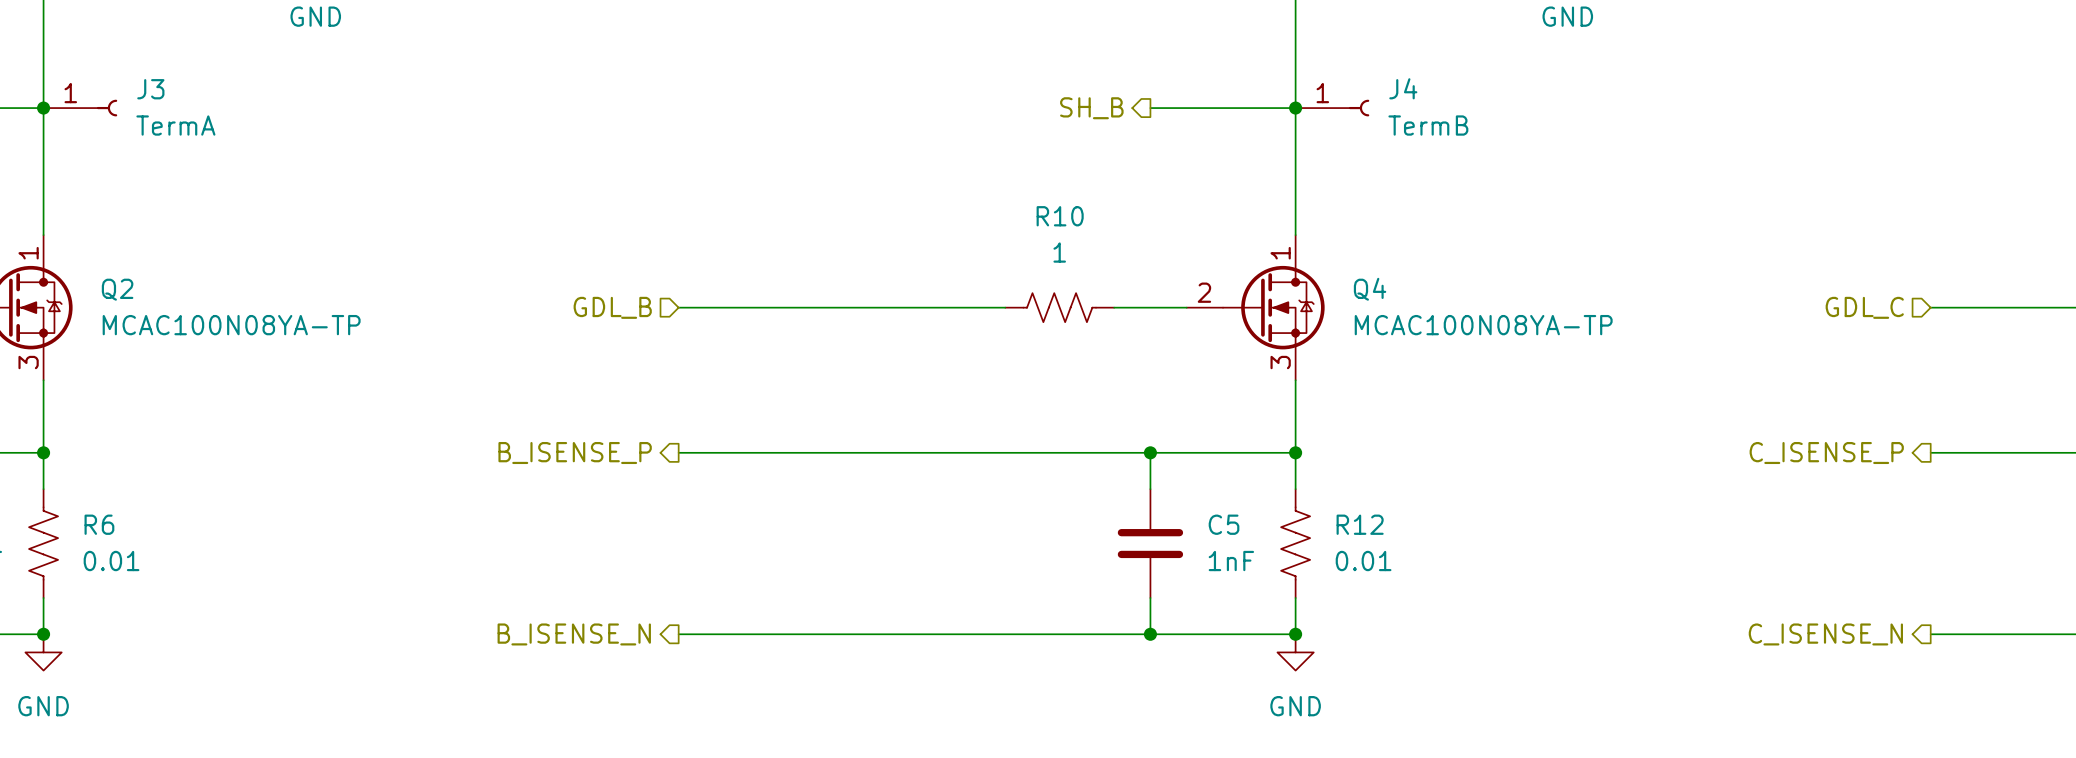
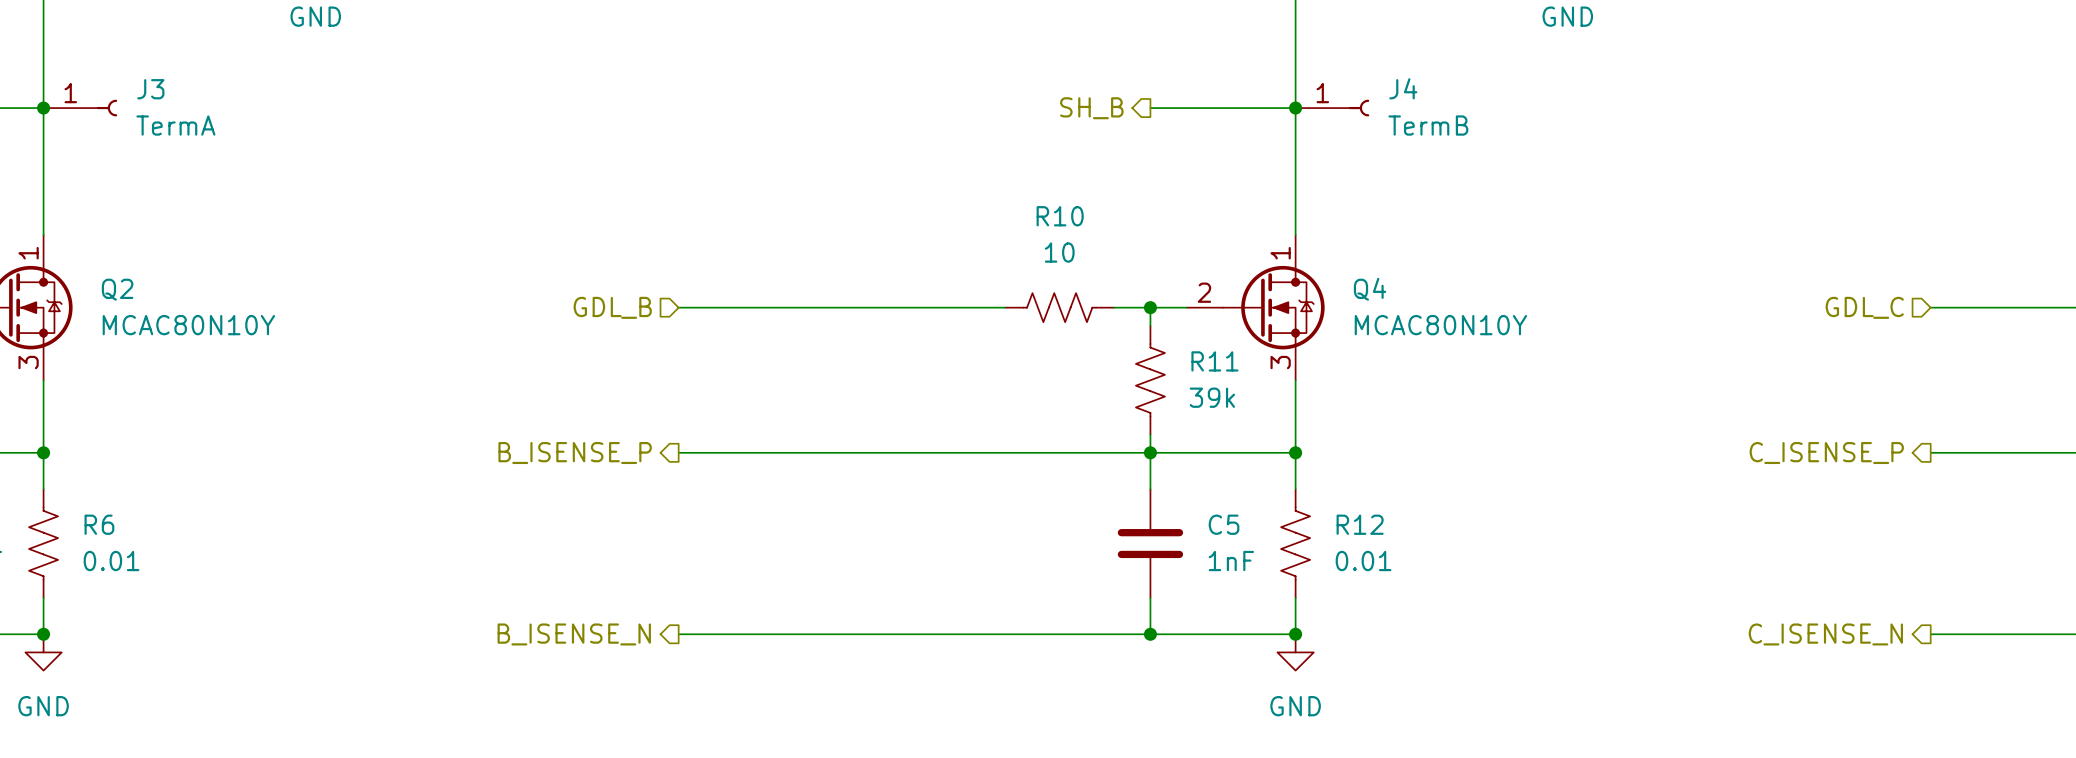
R10 value: 1 (1059, 252) -> 10 (1059, 252)
wire: none -> (1150, 307) (1150, 325)
junction: none -> (1150, 307)
Q2 value: MCAC100N08YA-TP (231, 325) -> MCAC80N10Y (188, 325)
Q4 value: MCAC100N08YA-TP (1483, 325) -> MCAC80N10Y (1440, 325)
R11: none -> 39k (1150, 380)
wire: none -> (1150, 434) (1150, 452)

